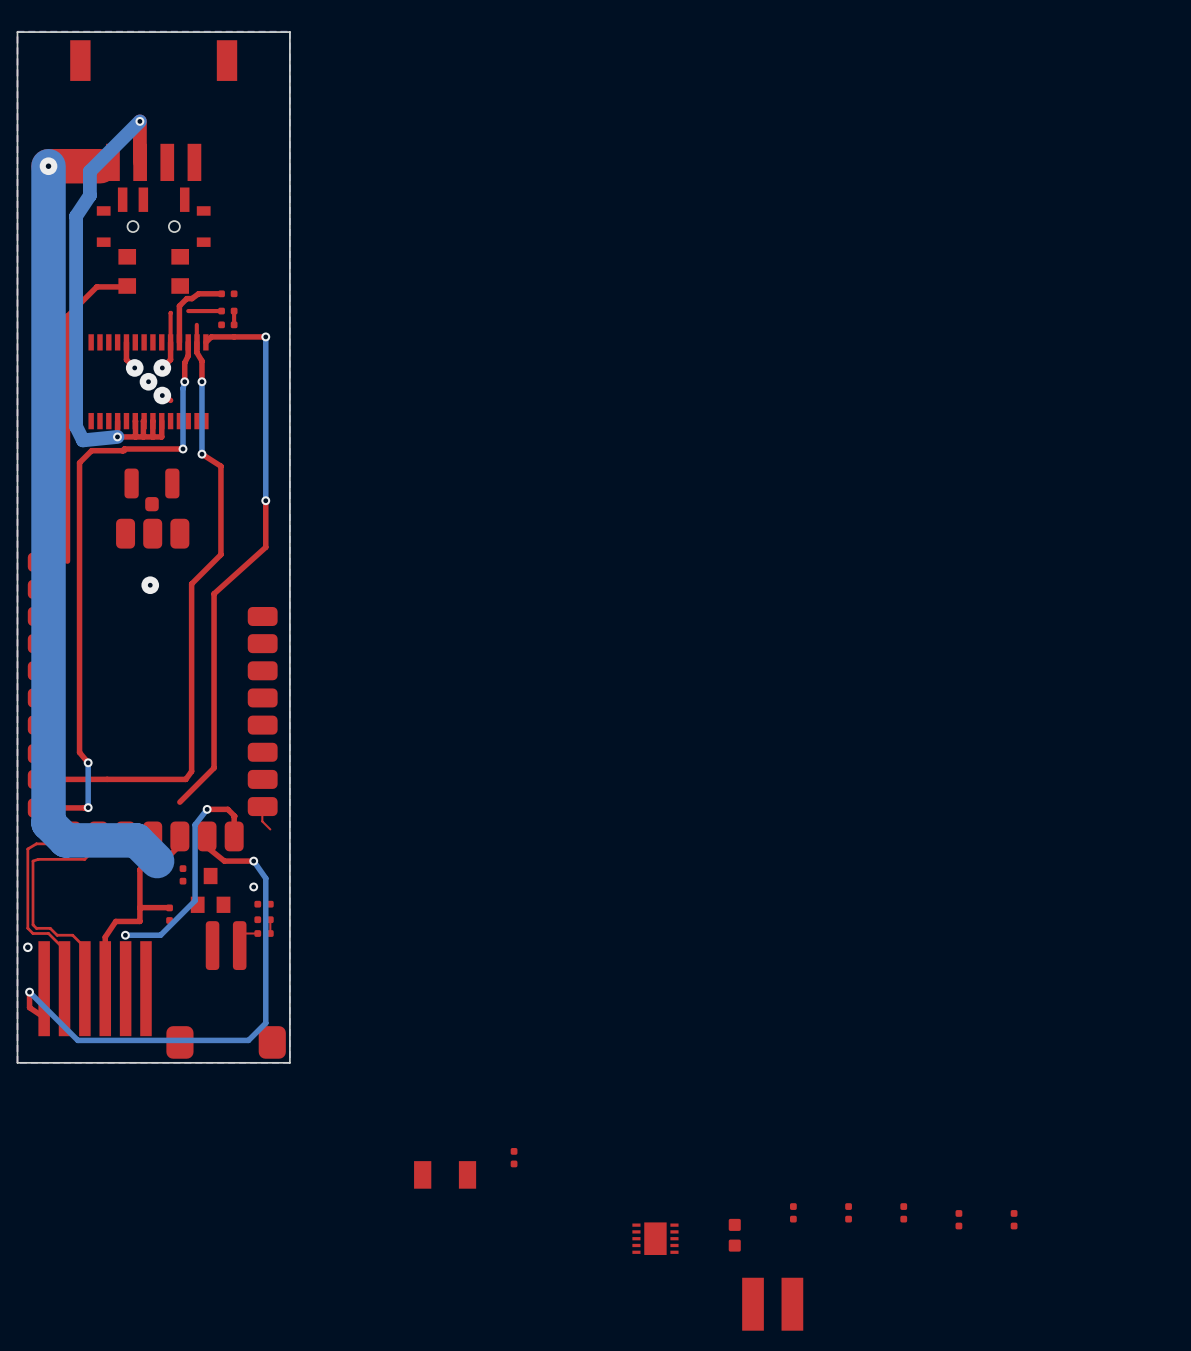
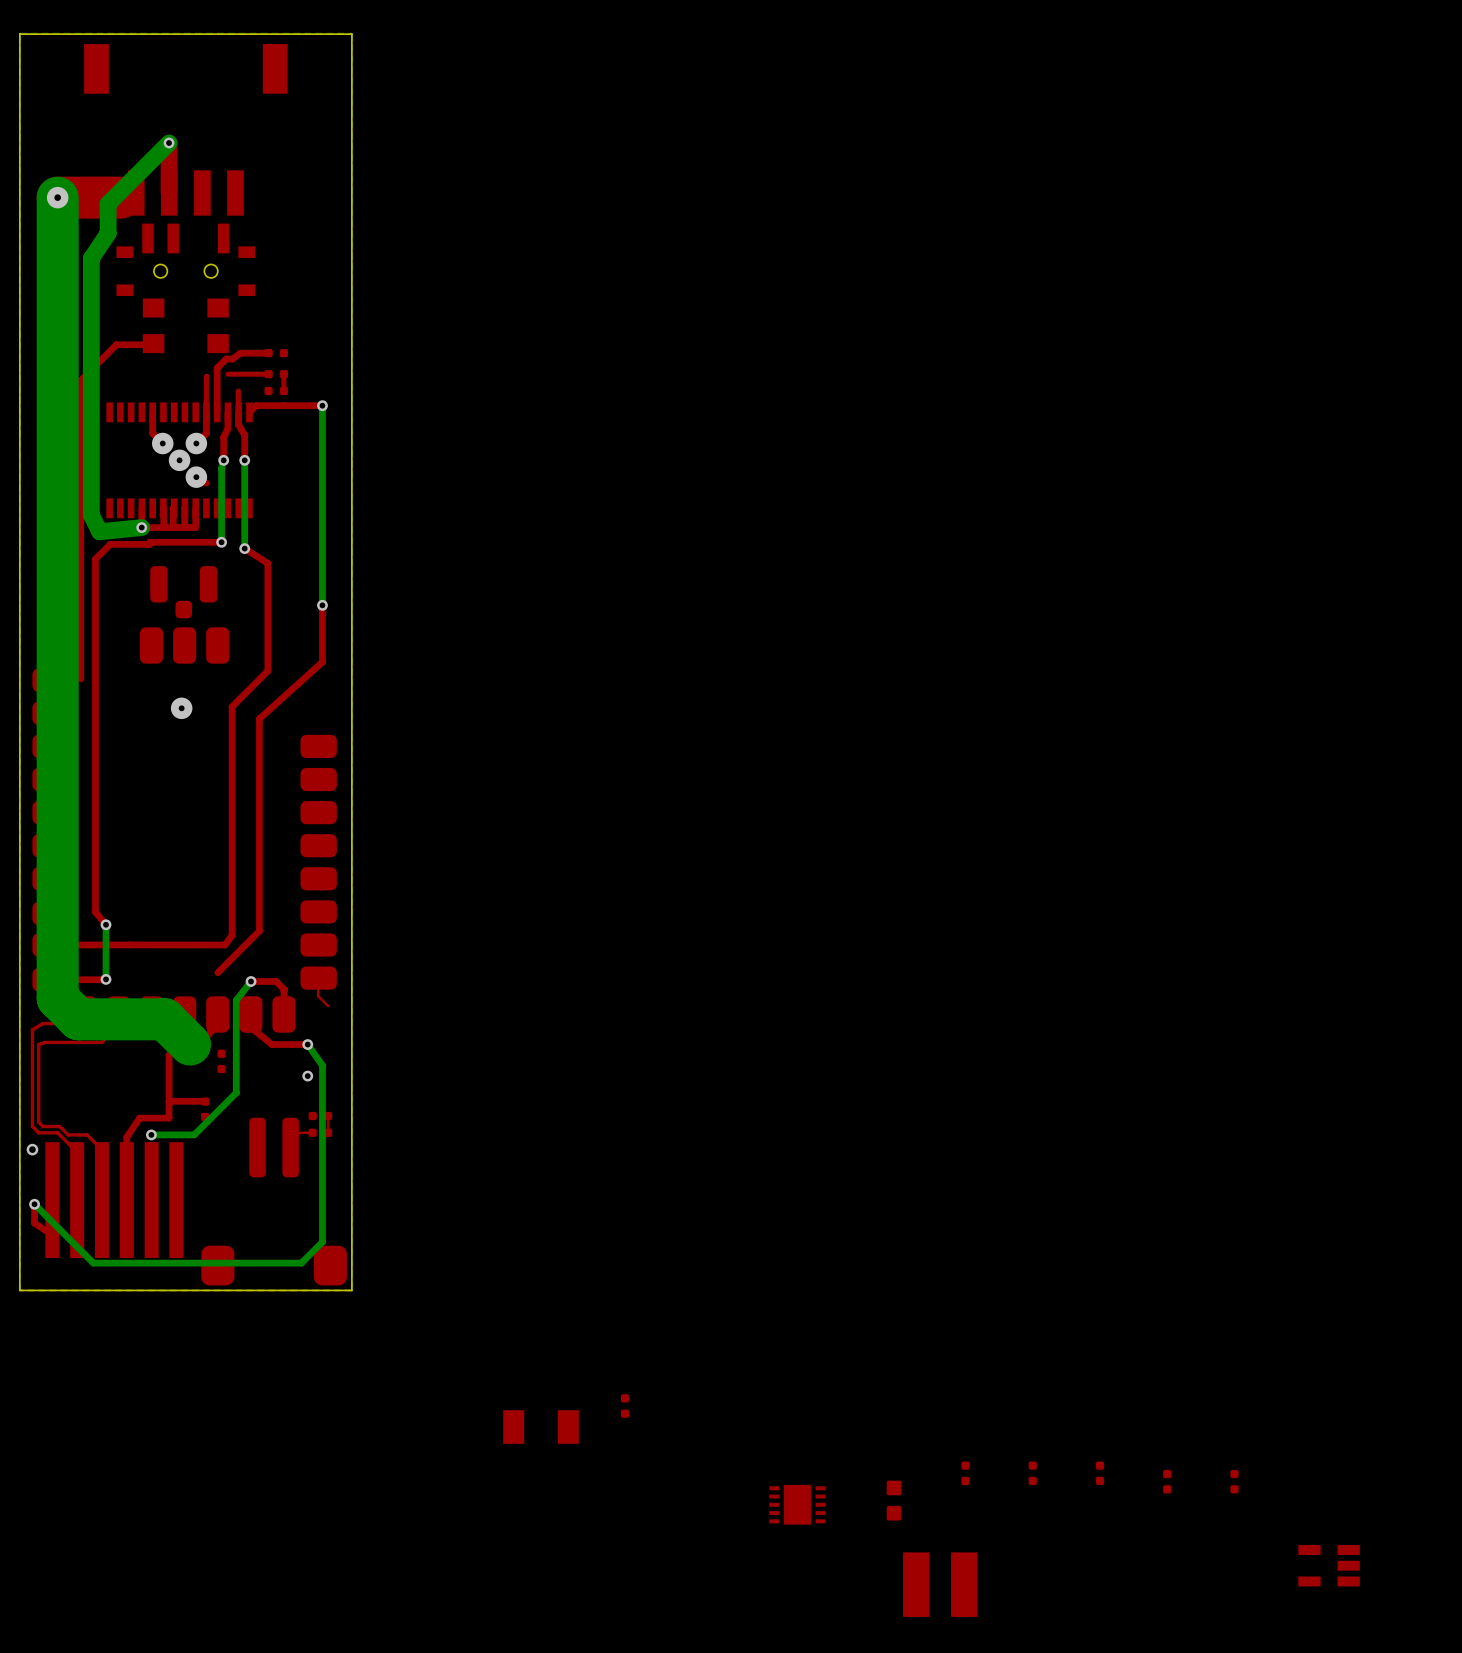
part: (210, 890) -> none
part: (264, 904) -> none
part: none -> (1329, 1565)

